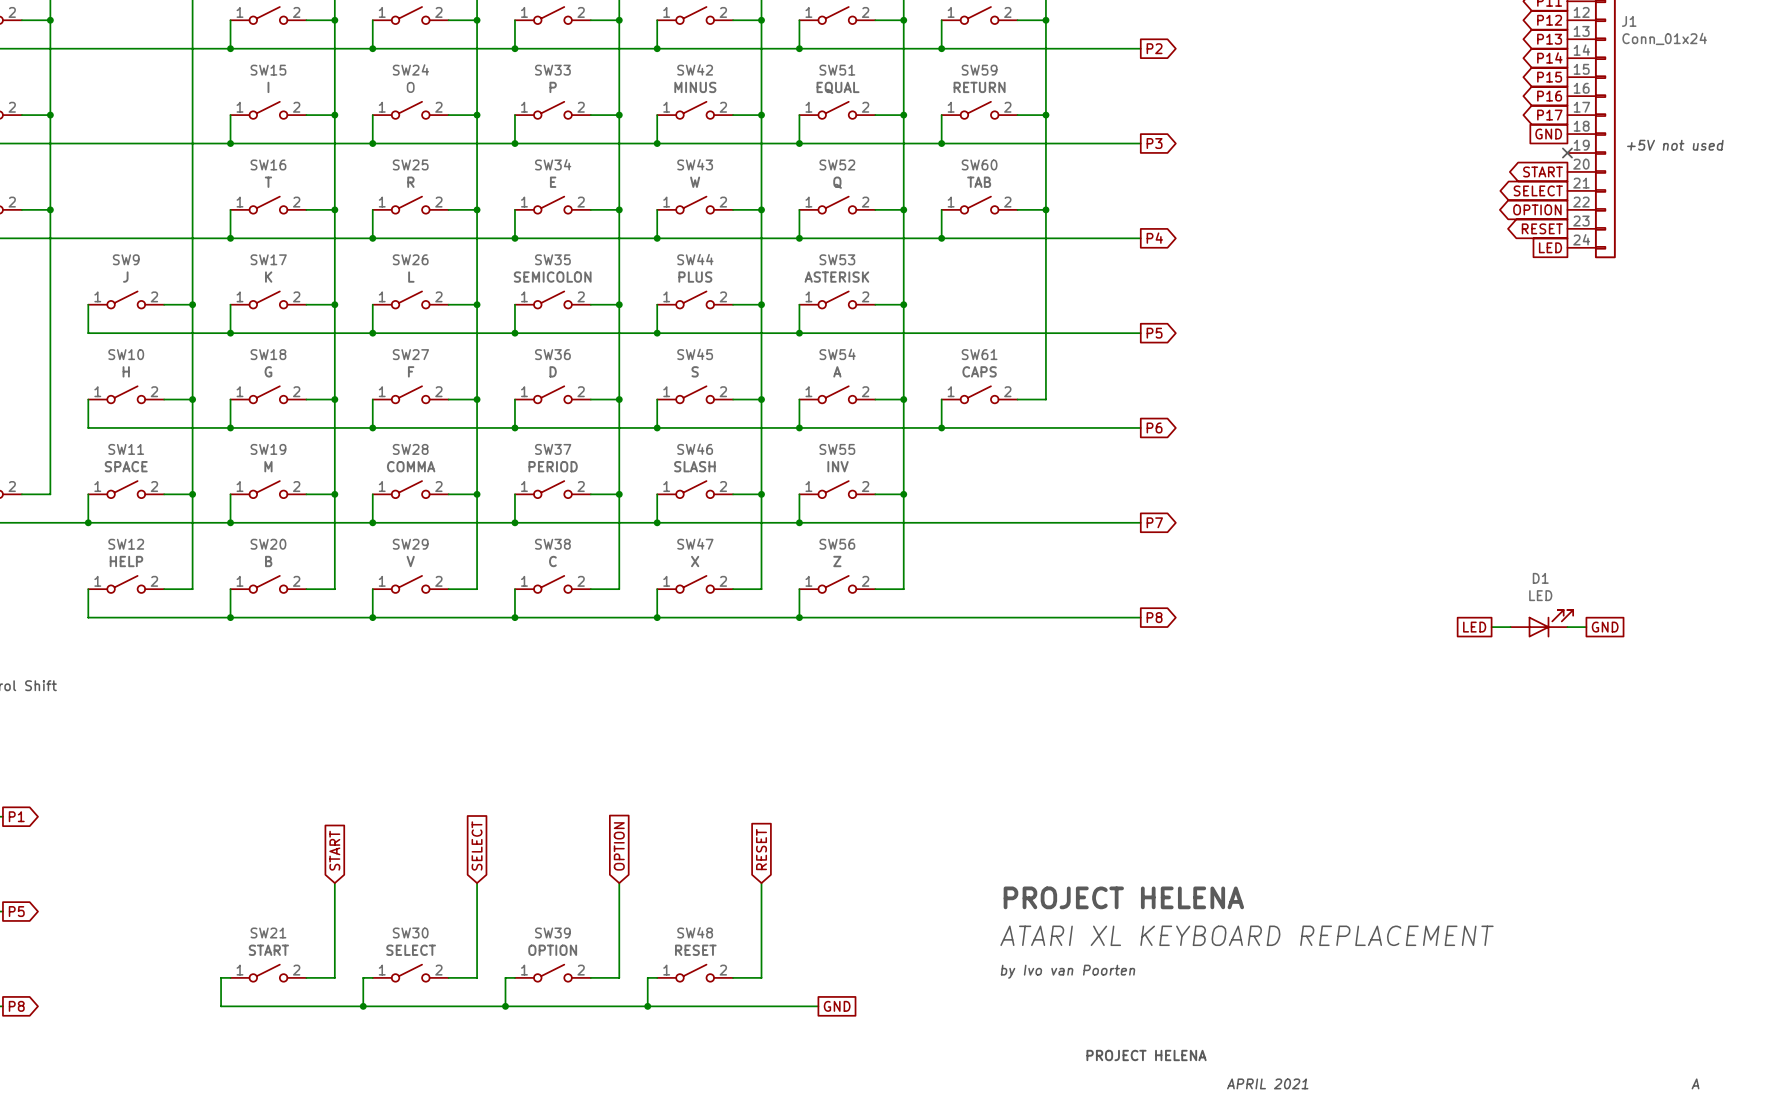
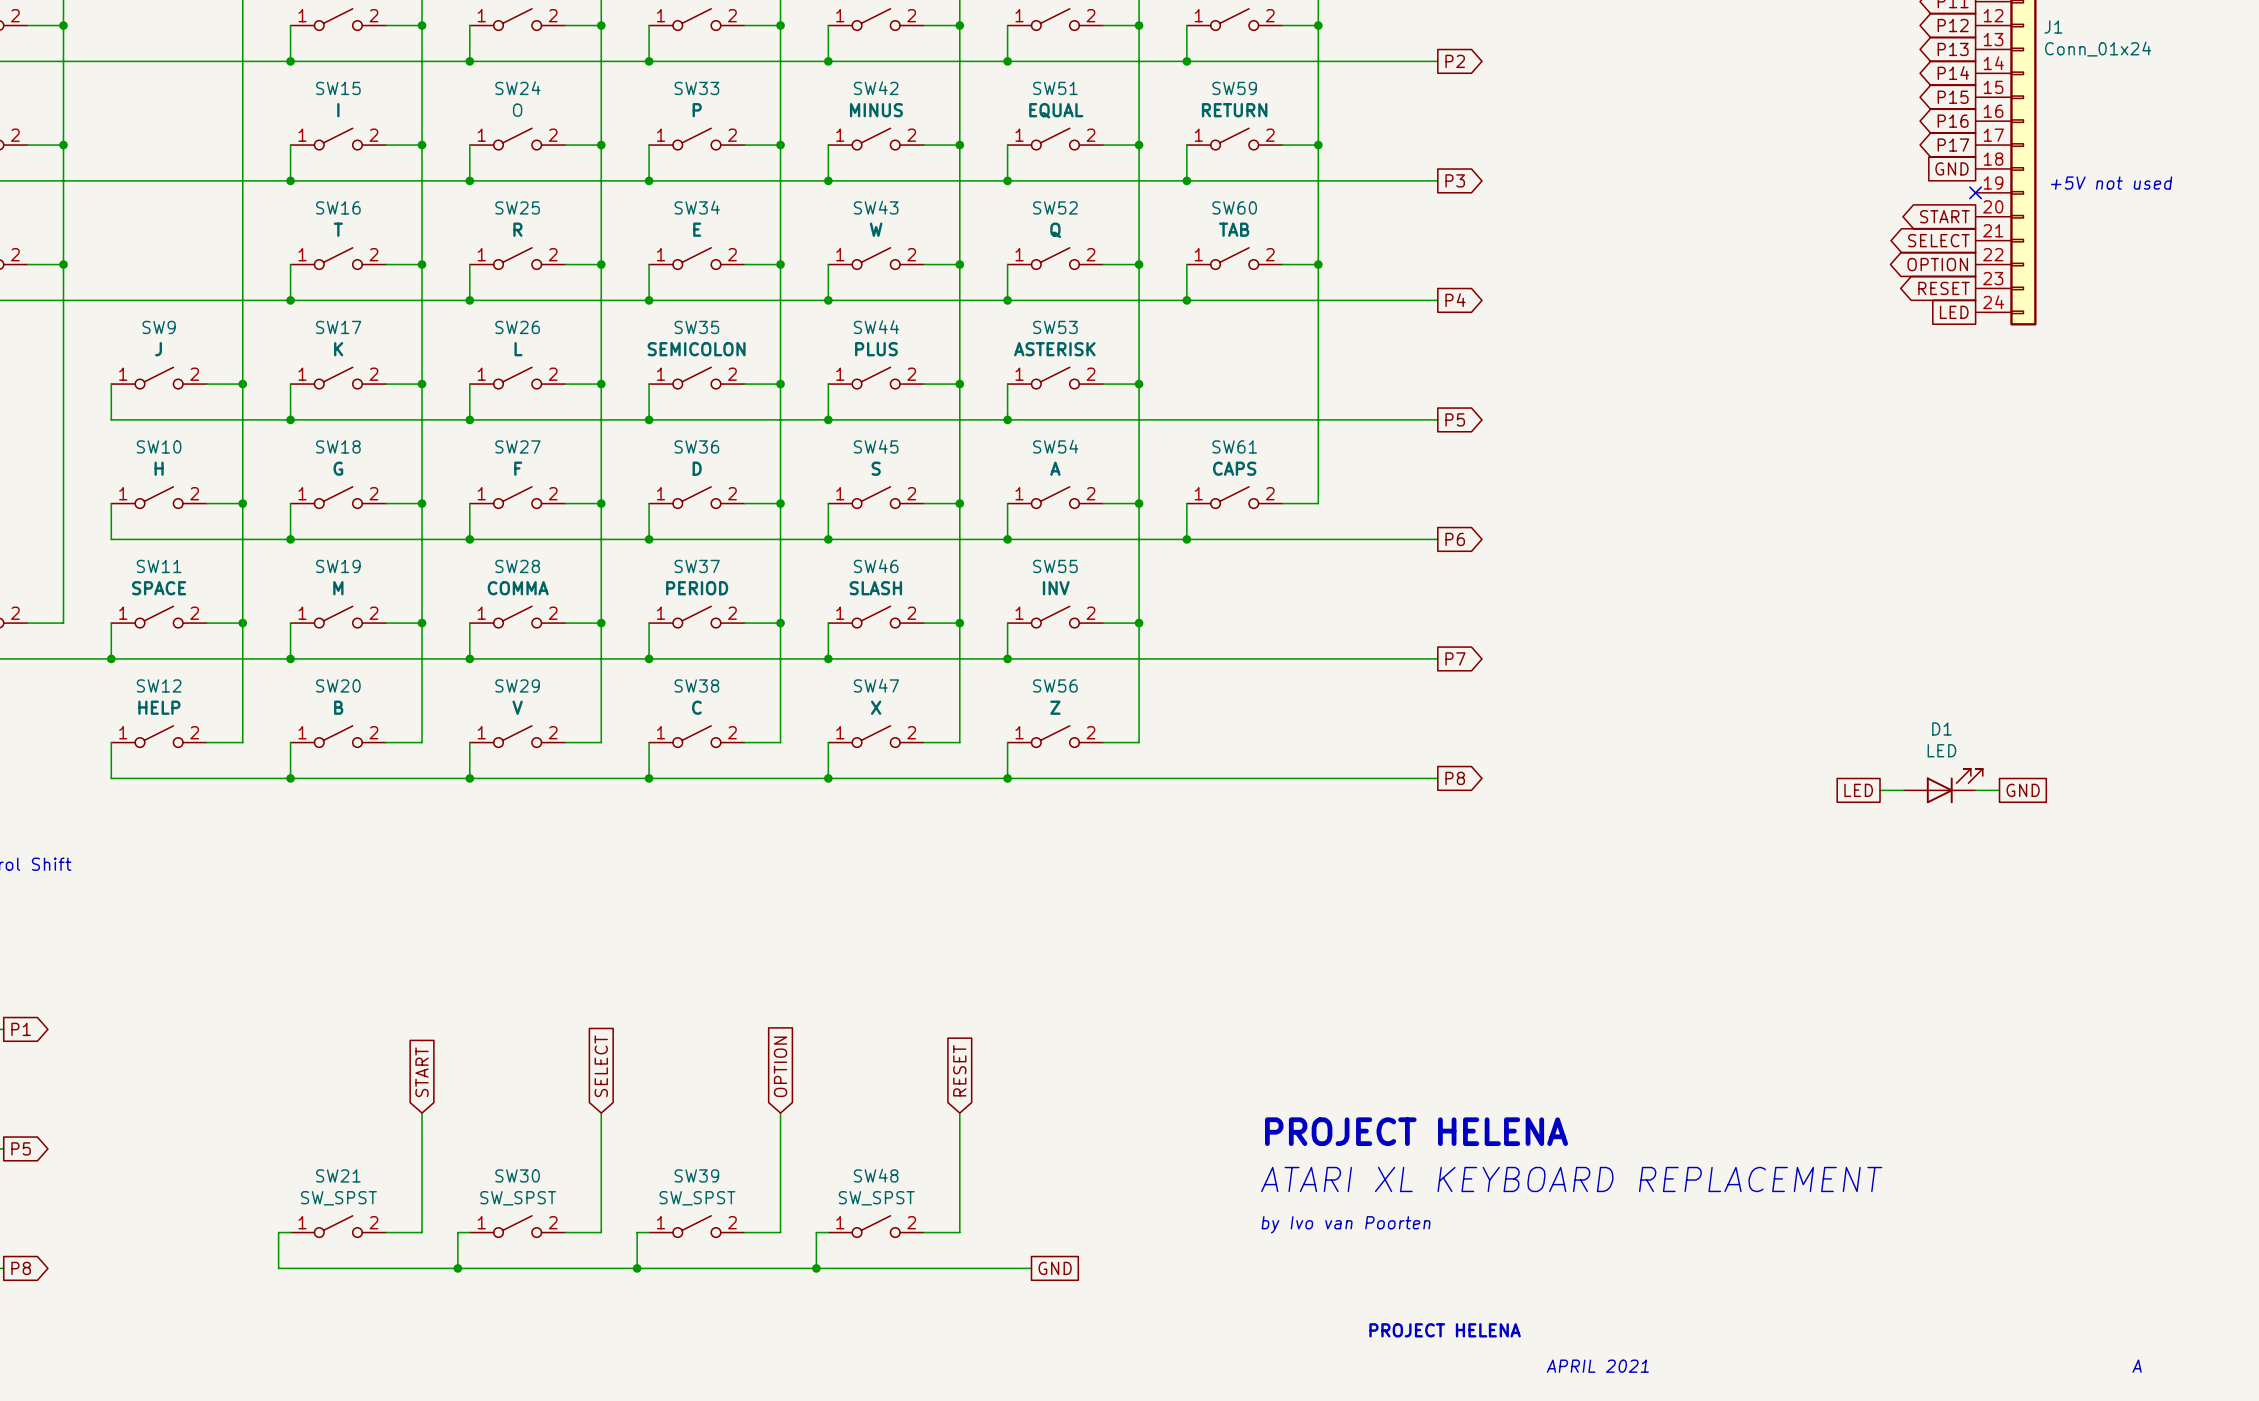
SW21 value: START (268, 950) -> SW_SPST (338, 1198)
SW30 value: SELECT (411, 950) -> SW_SPST (518, 1198)
SW39 value: OPTION (552, 950) -> SW_SPST (697, 1198)
SW48 value: RESET (695, 950) -> SW_SPST (876, 1198)

